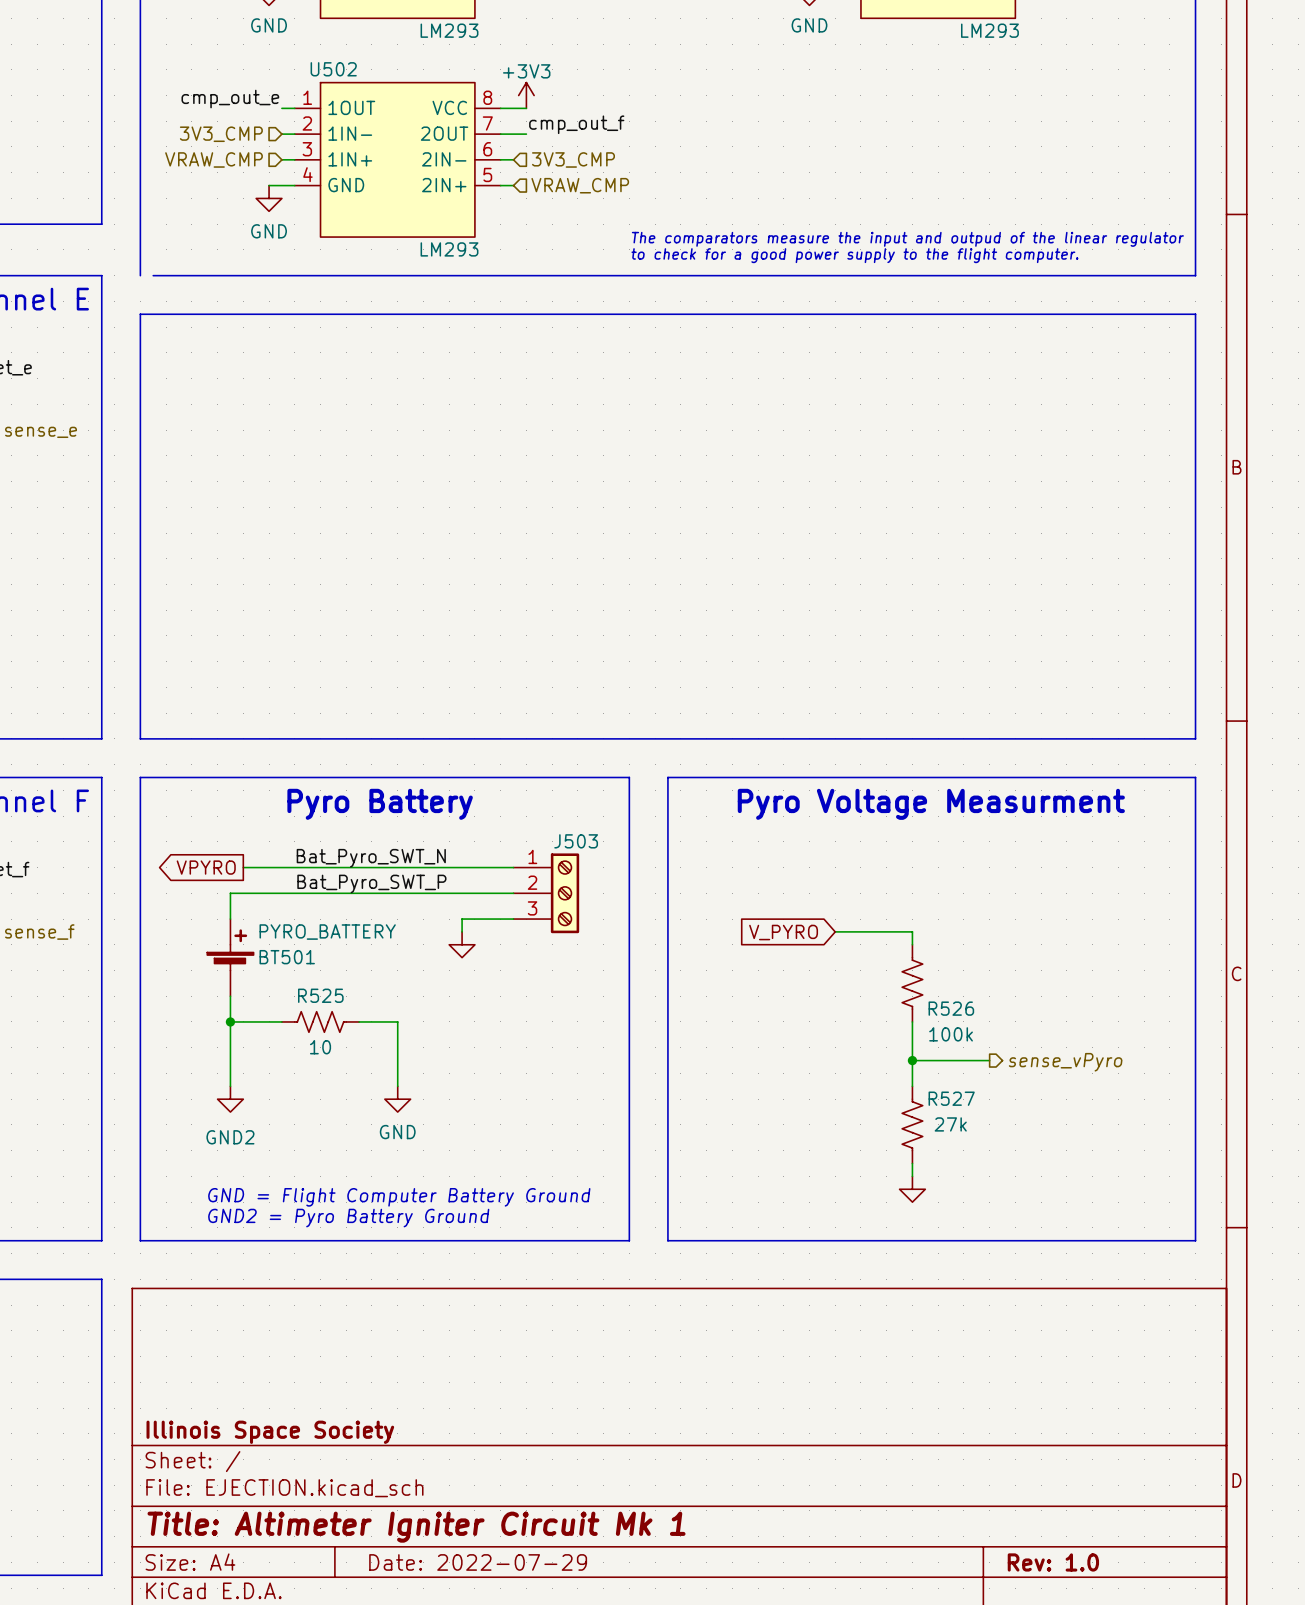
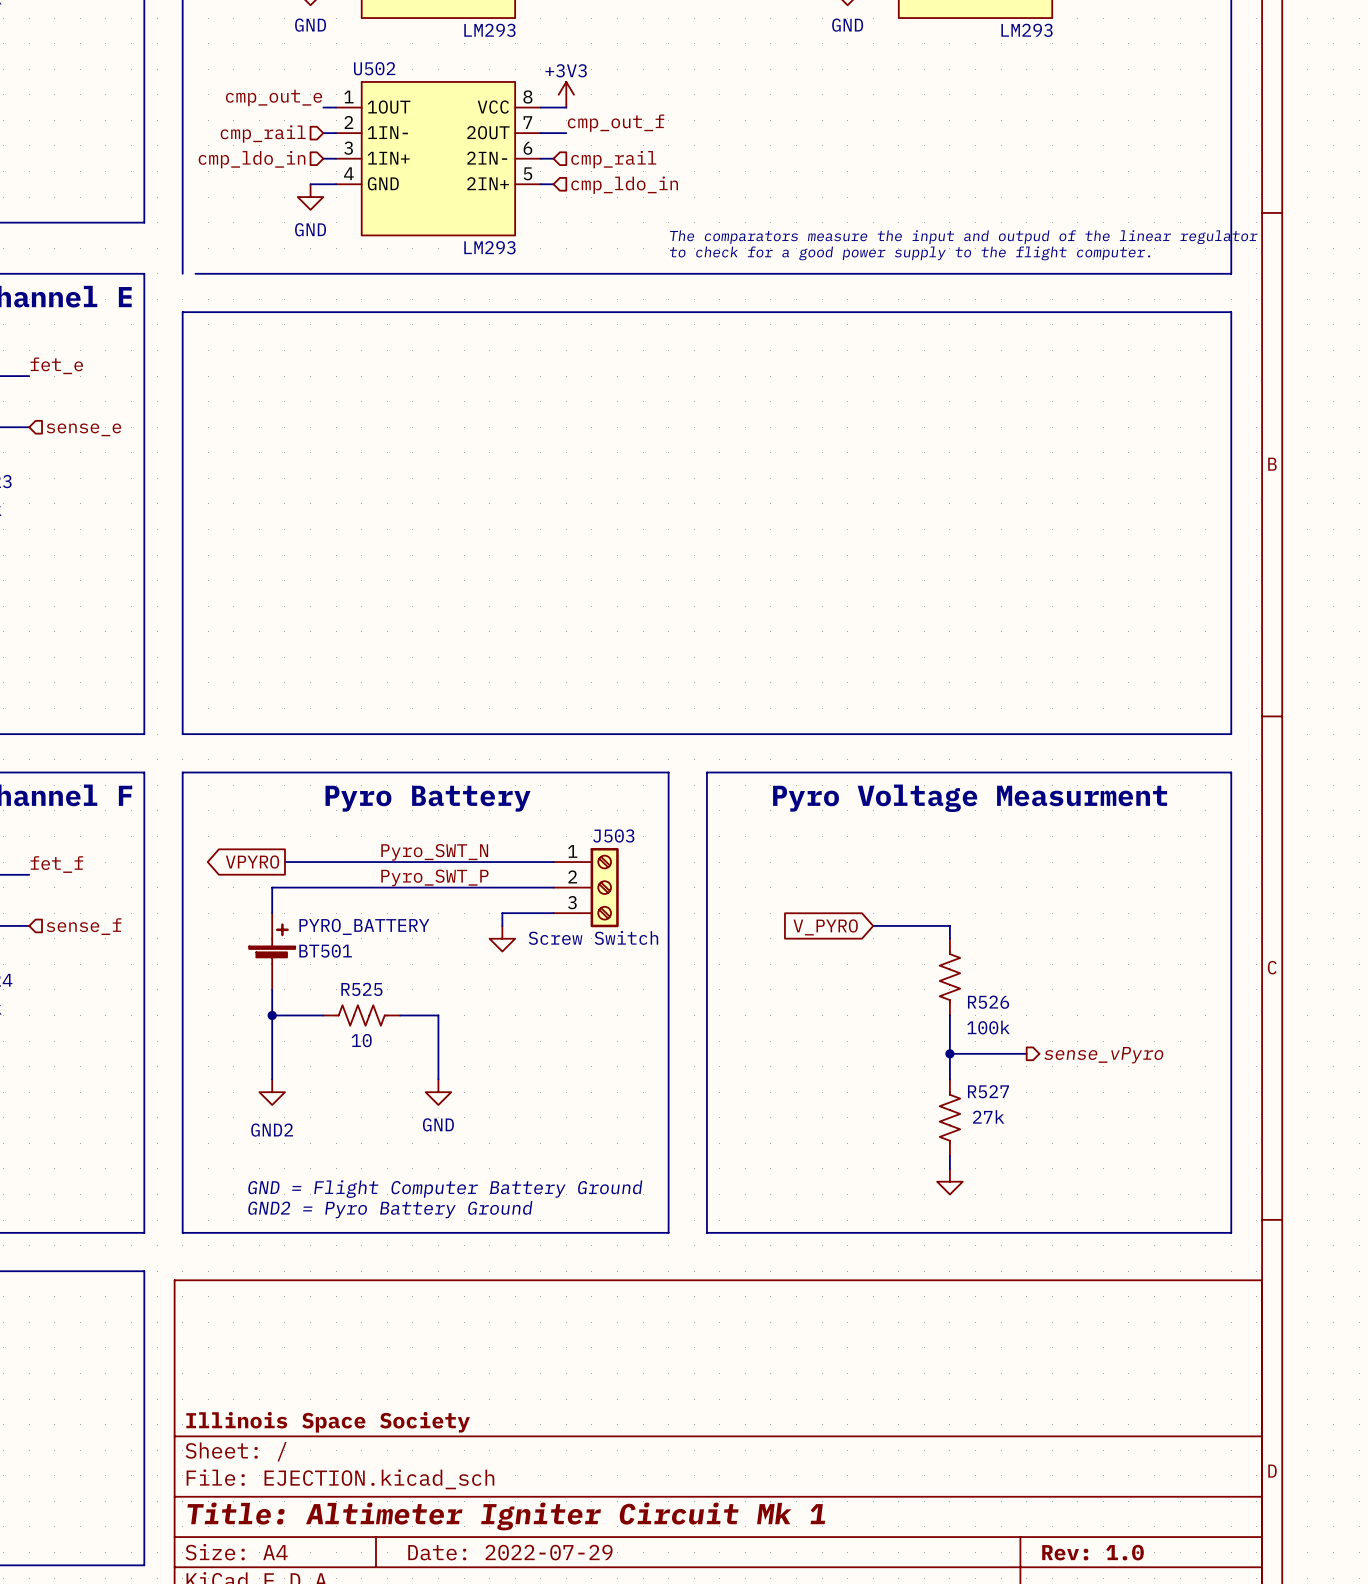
hierarchical label: 3V3_CMP (221, 134) -> cmp_rail (263, 134)
hierarchical label: VRAW_CMP (214, 159) -> cmp_ldo_in (252, 159)
hierarchical label: 3V3_CMP (573, 159) -> cmp_rail (613, 159)
hierarchical label: VRAW_CMP (580, 185) -> cmp_ldo_in (624, 185)
label: Bat_Pyro_SWT_N (371, 858) -> Pyro_SWT_N (434, 852)
label: Bat_Pyro_SWT_P (371, 883) -> Pyro_SWT_P (434, 877)
J503 value: none -> Screw Switch (593, 937)

